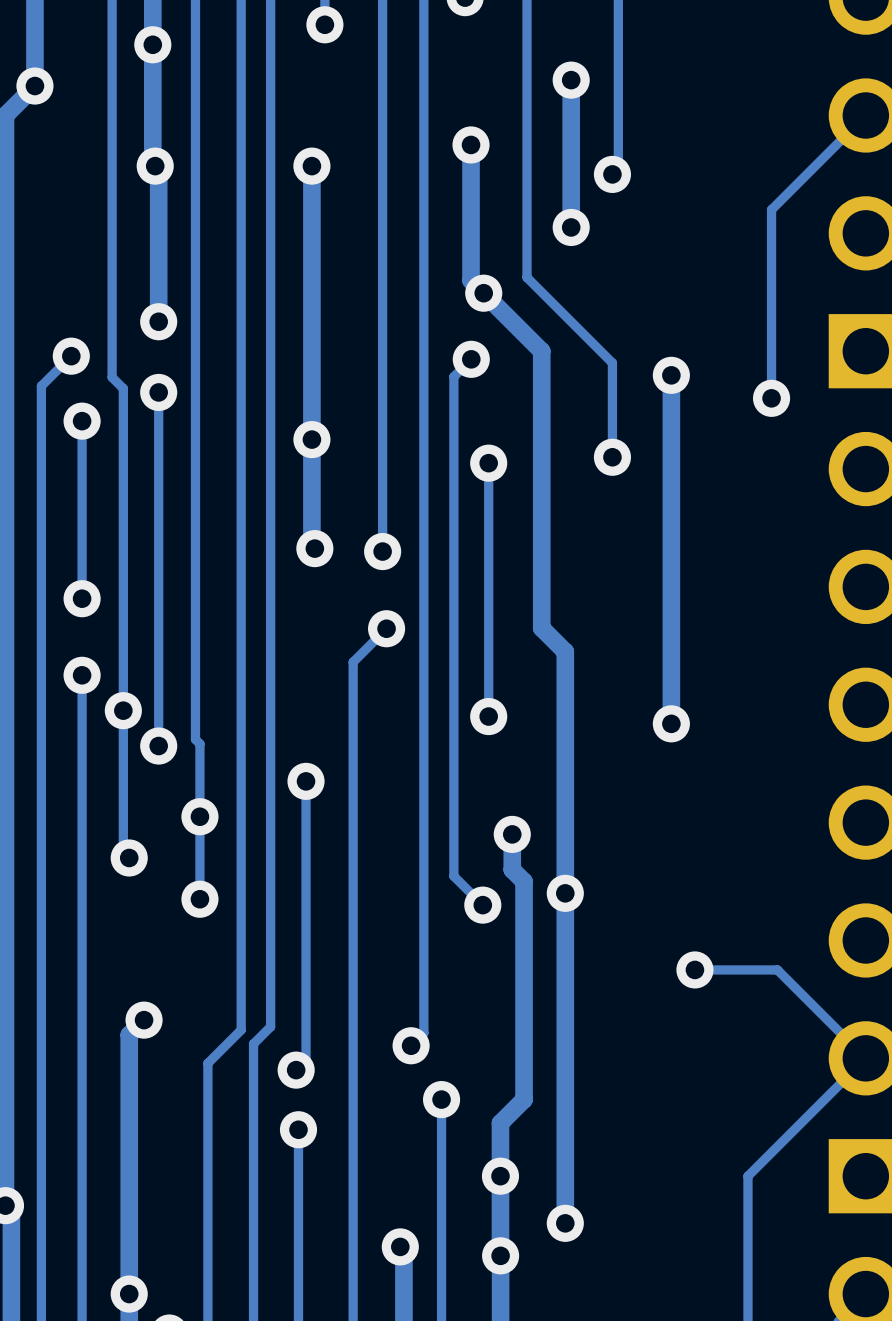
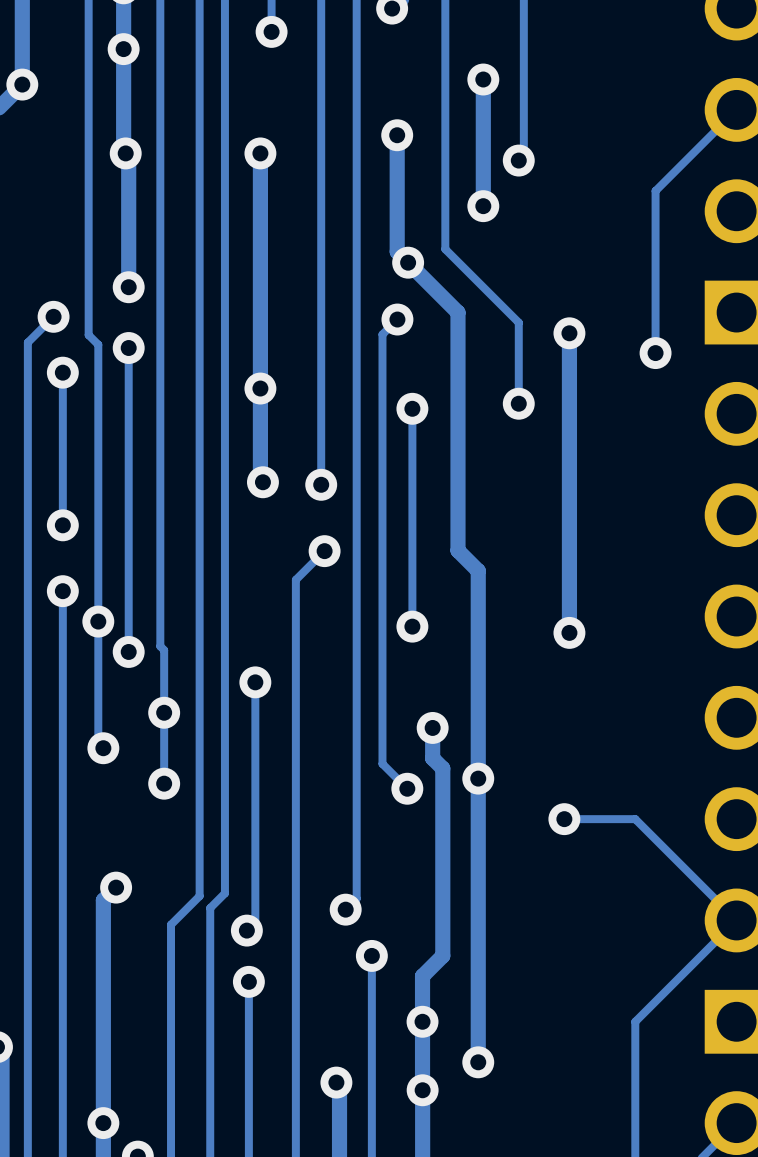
via position: (694, 969) -> (564, 819)
track: (777, 969) (694, 969) -> (660, 844) (635, 819) (564, 819)

